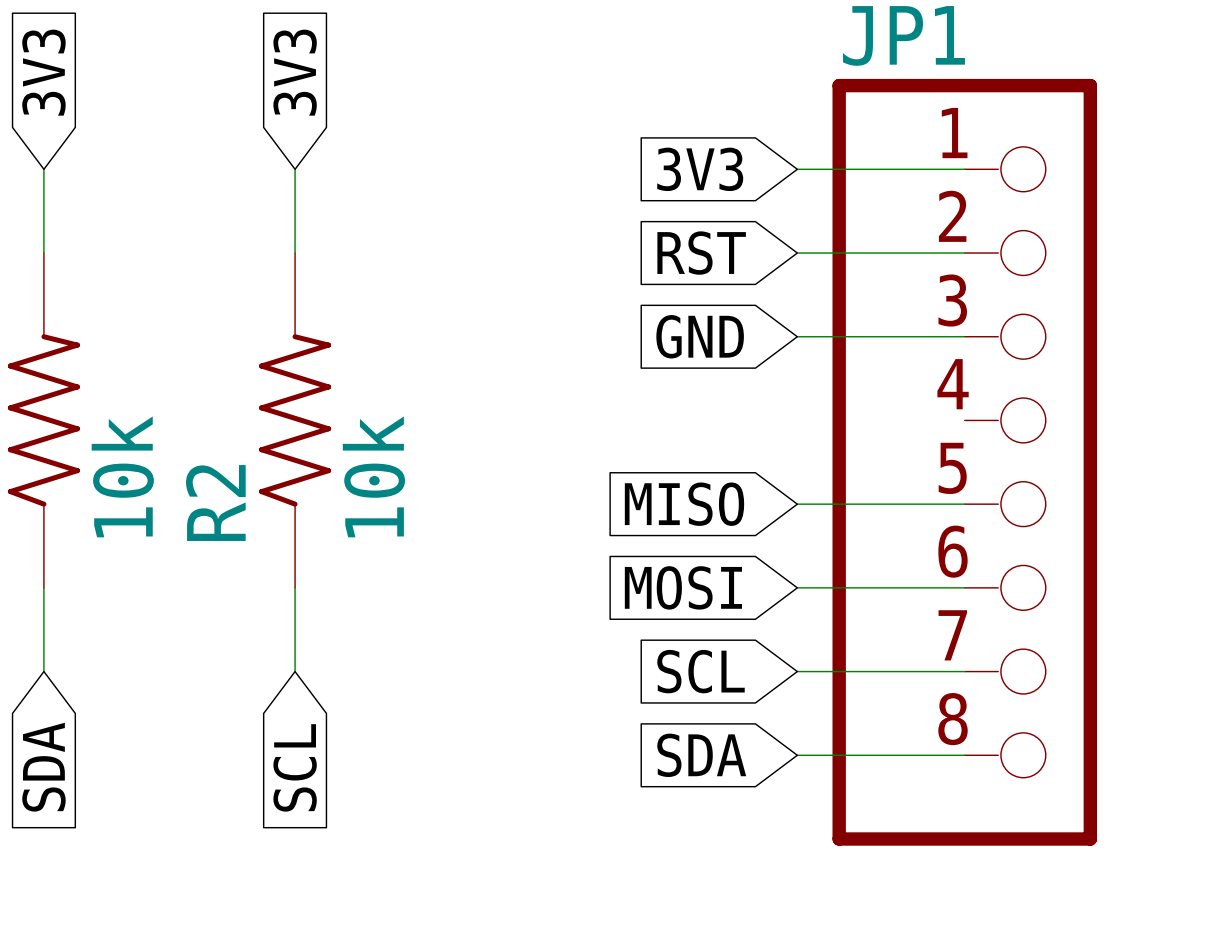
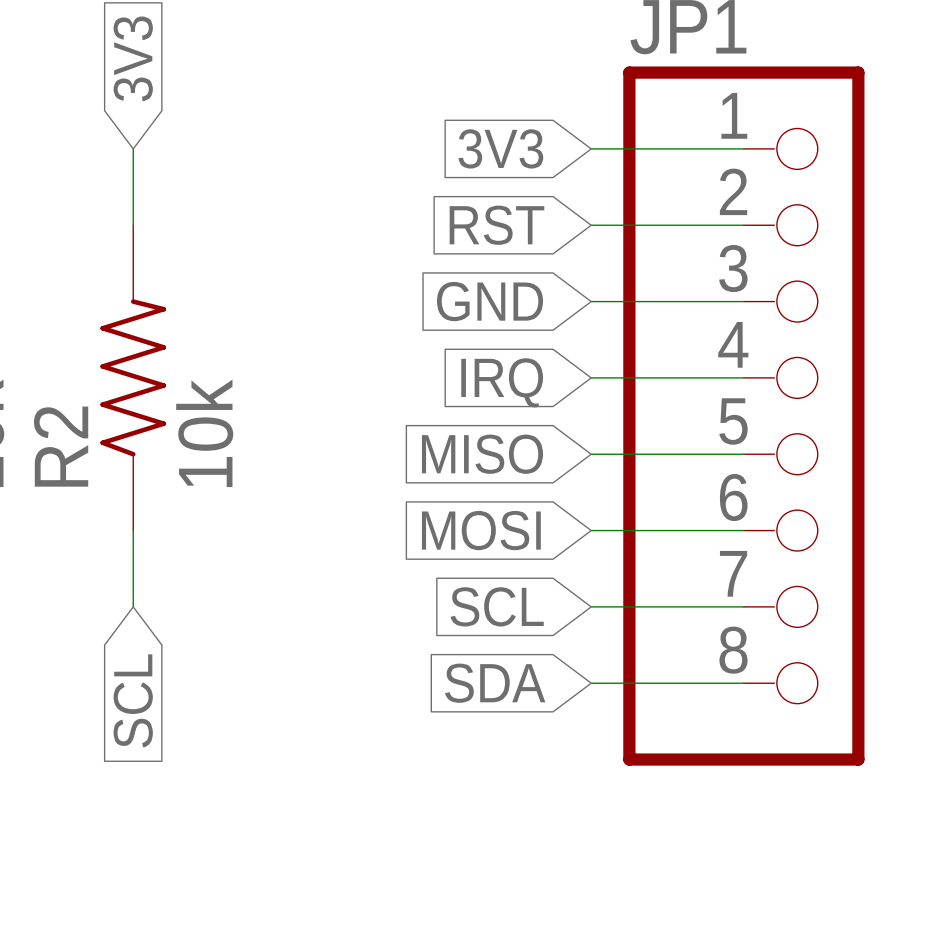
wire: none -> (591, 377) (743, 377)
global label: none -> IRQ (502, 382)

